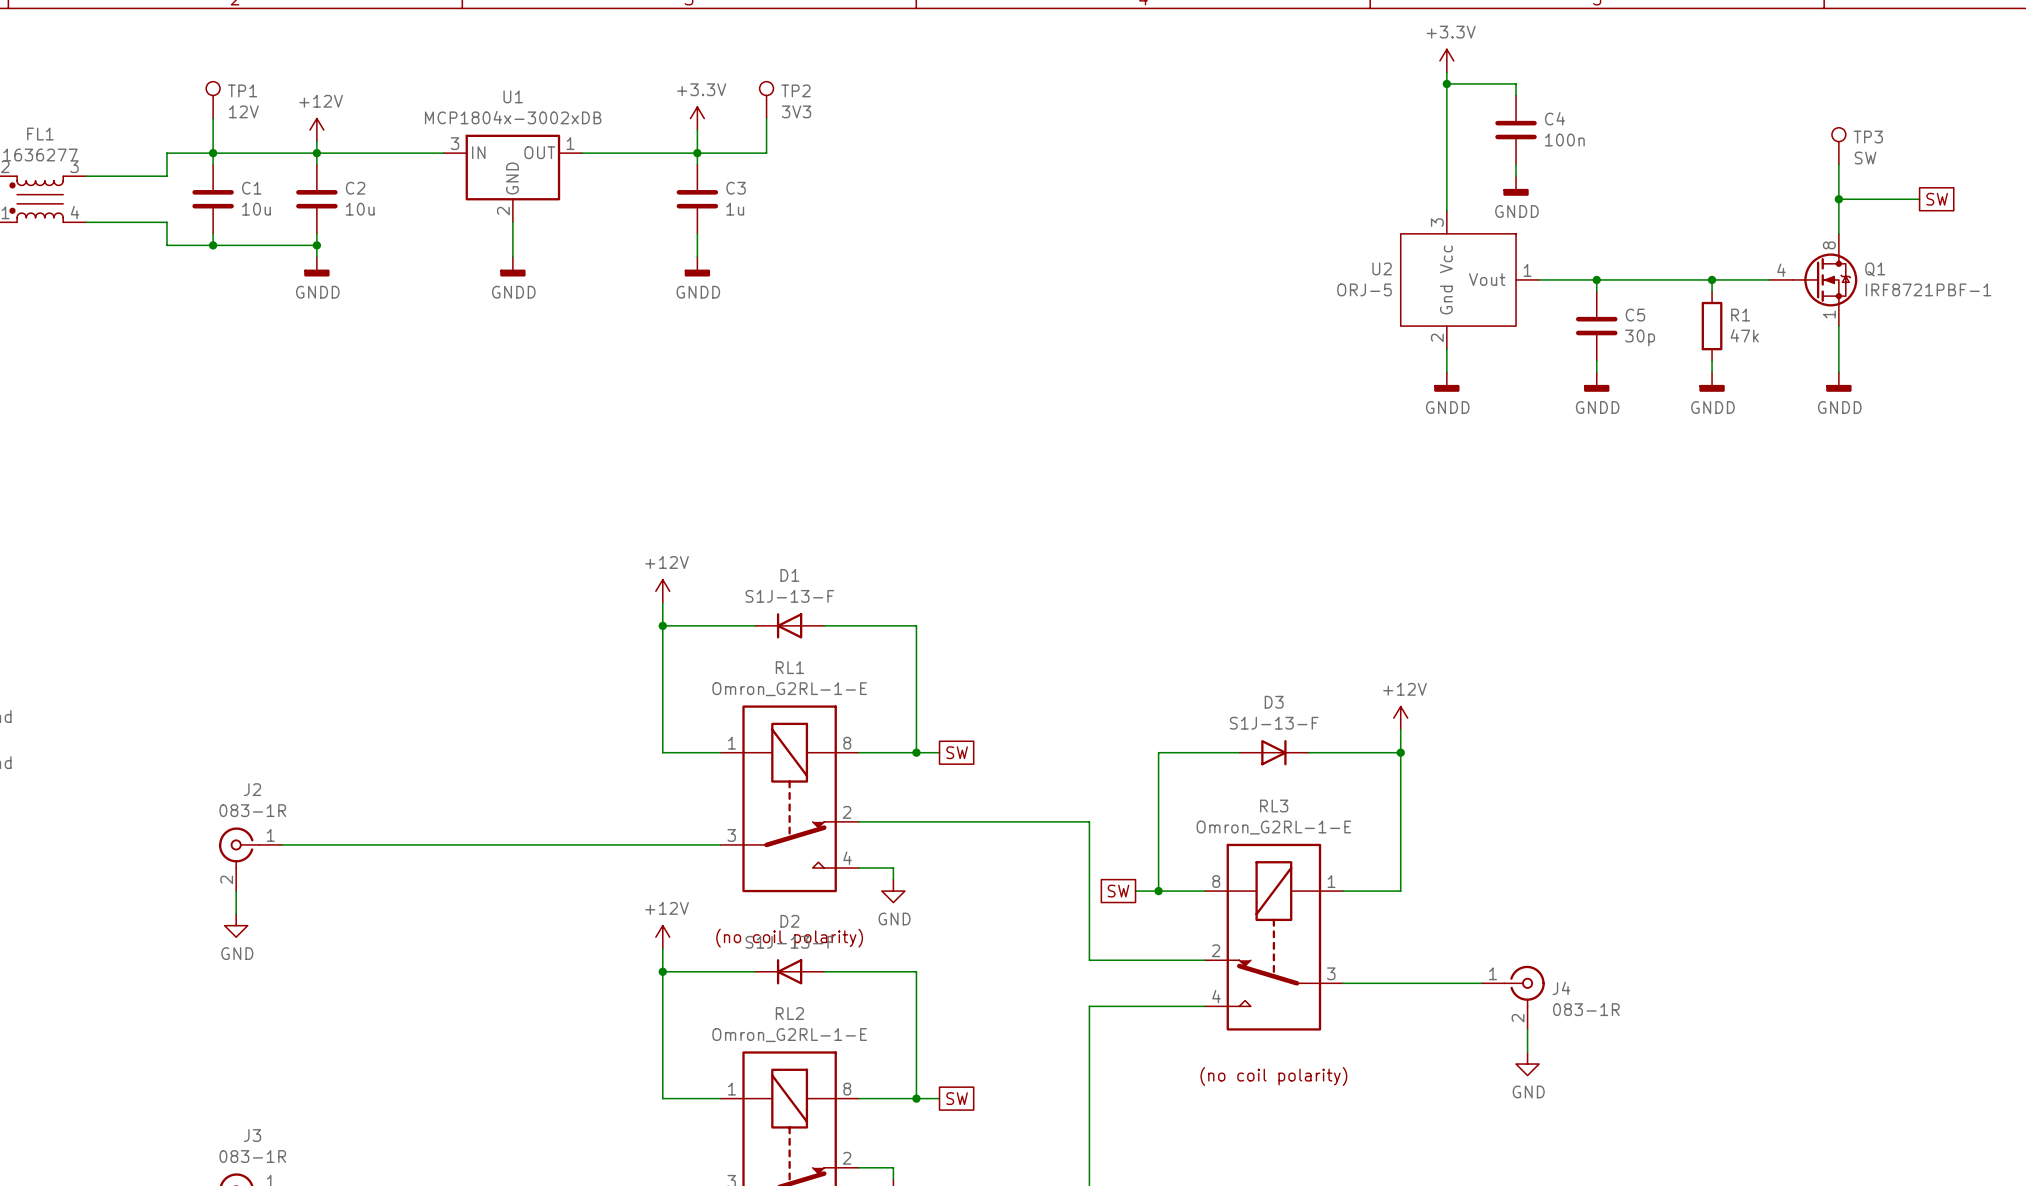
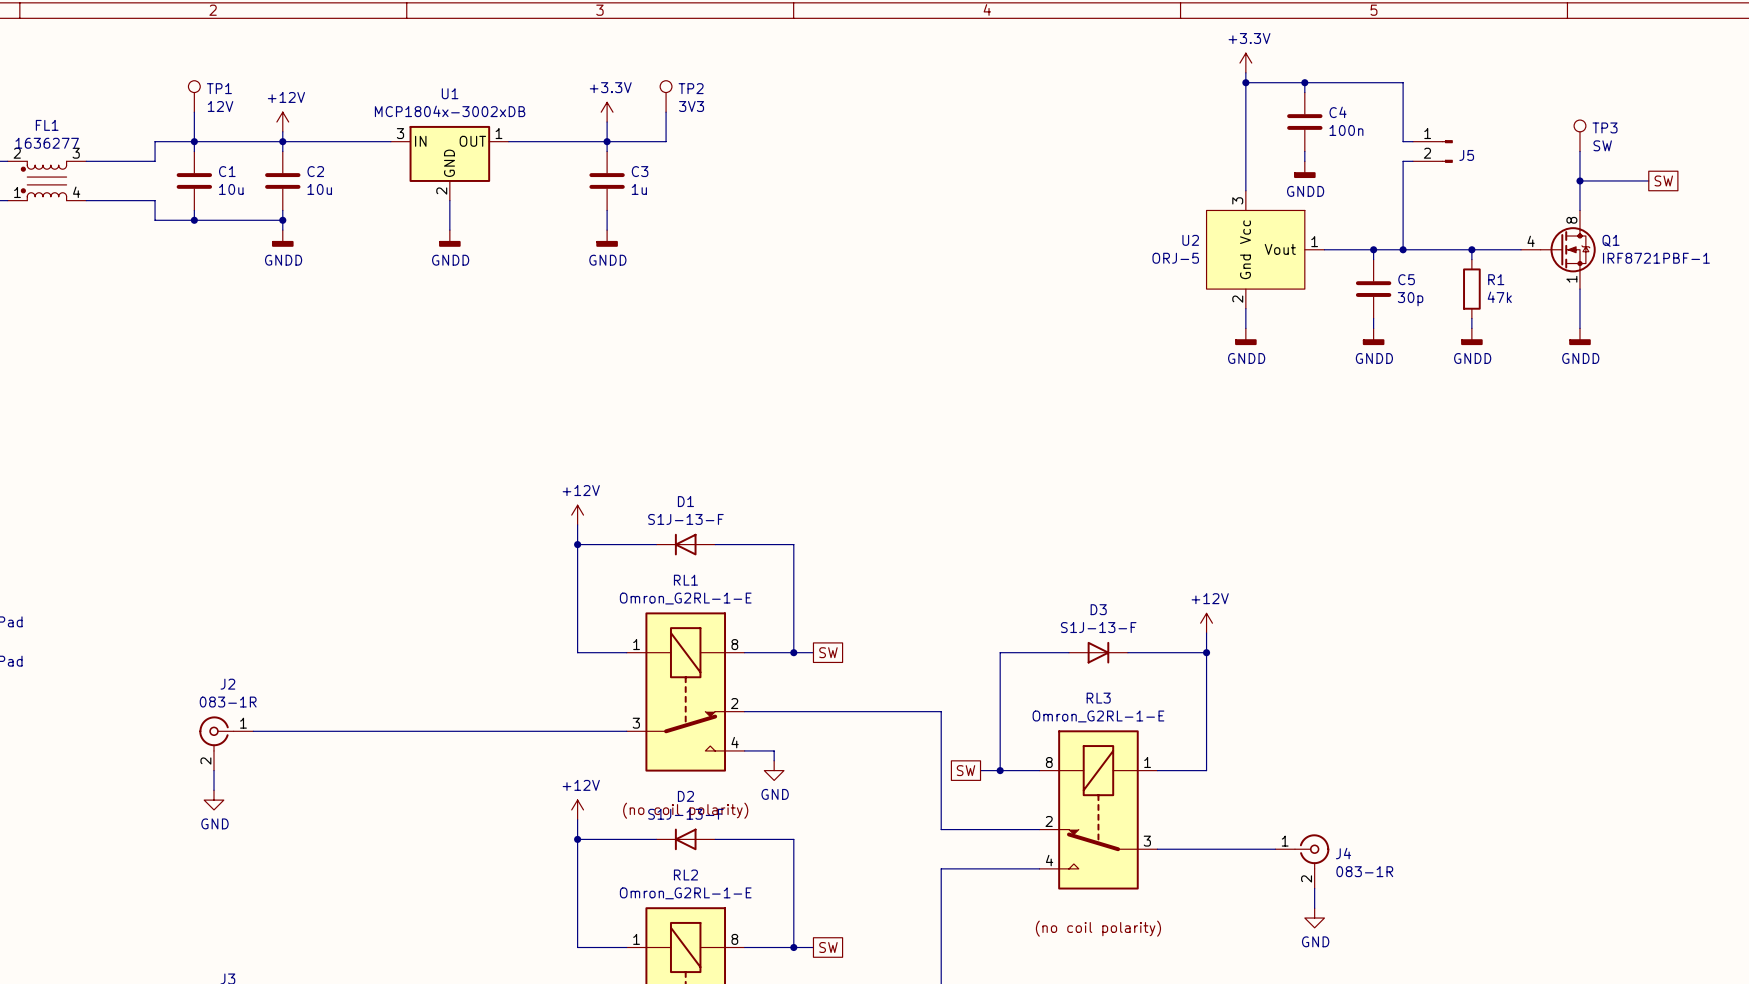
wire: none -> (1304, 82) (1403, 82) (1403, 141) (1412, 141)
junction: none -> (1304, 82)
J5: none -> (1432, 151)
wire: none -> (1412, 161) (1403, 161) (1403, 249)
junction: none -> (1403, 249)

